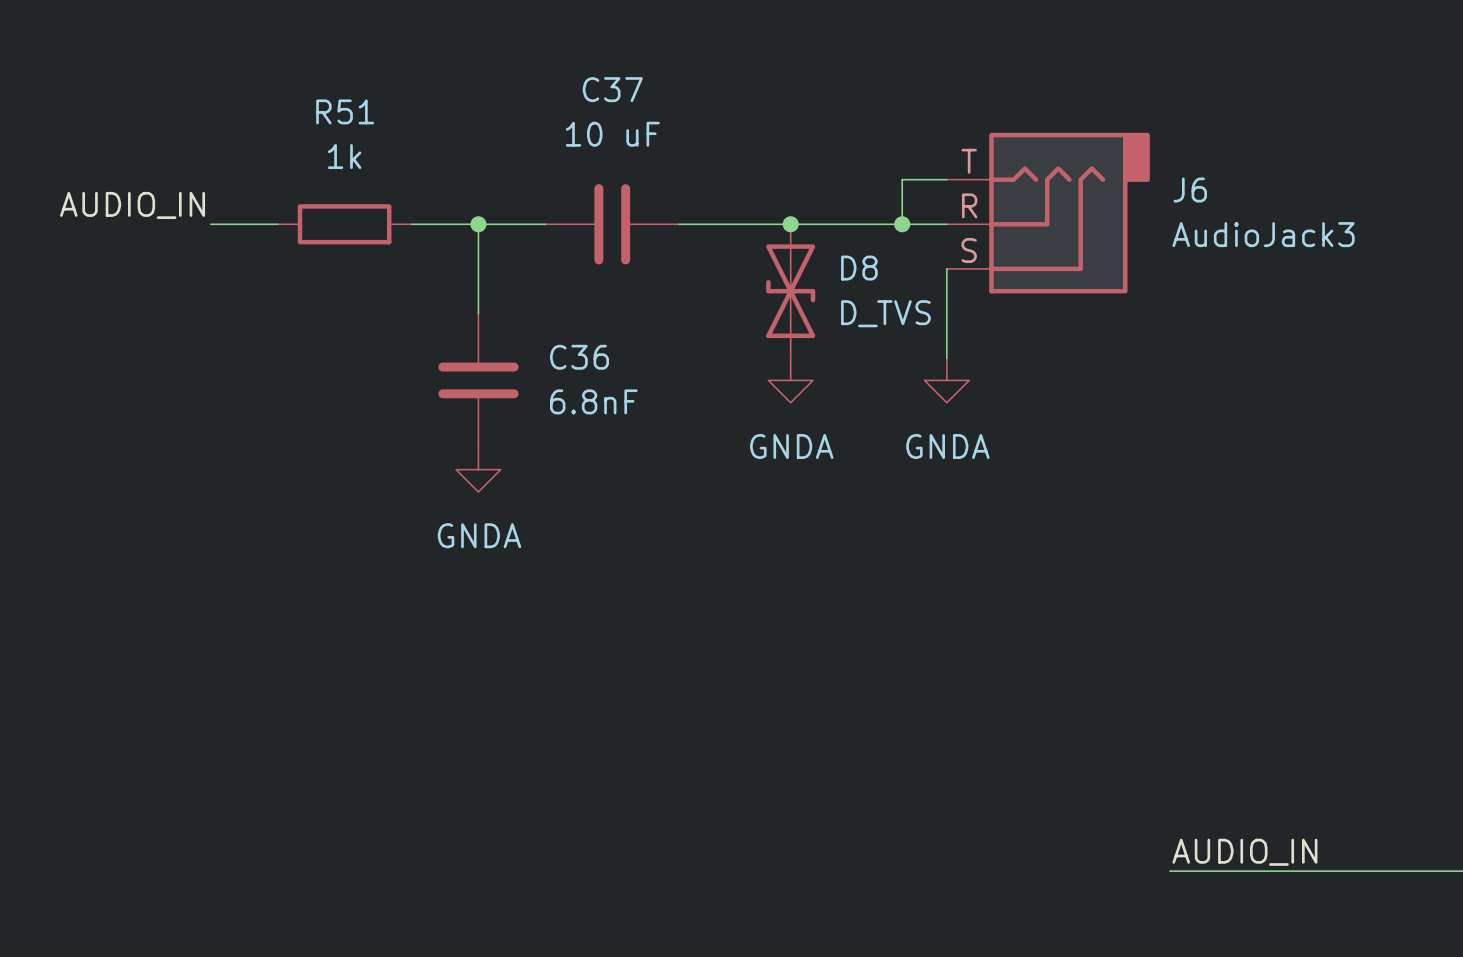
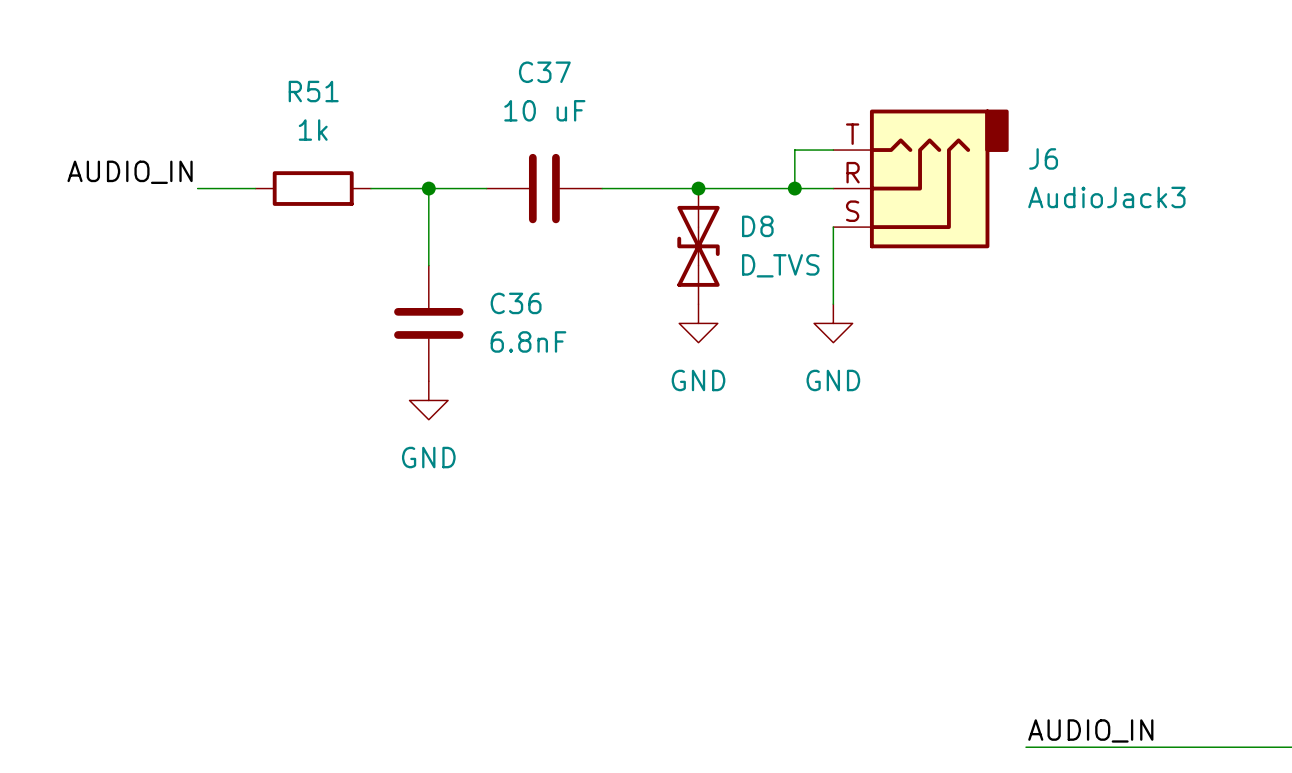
power symbol: GNDA (790, 380) -> GND (698, 323)
power symbol: GNDA (946, 380) -> GND (833, 323)
power symbol: GNDA (478, 469) -> GND (428, 400)

